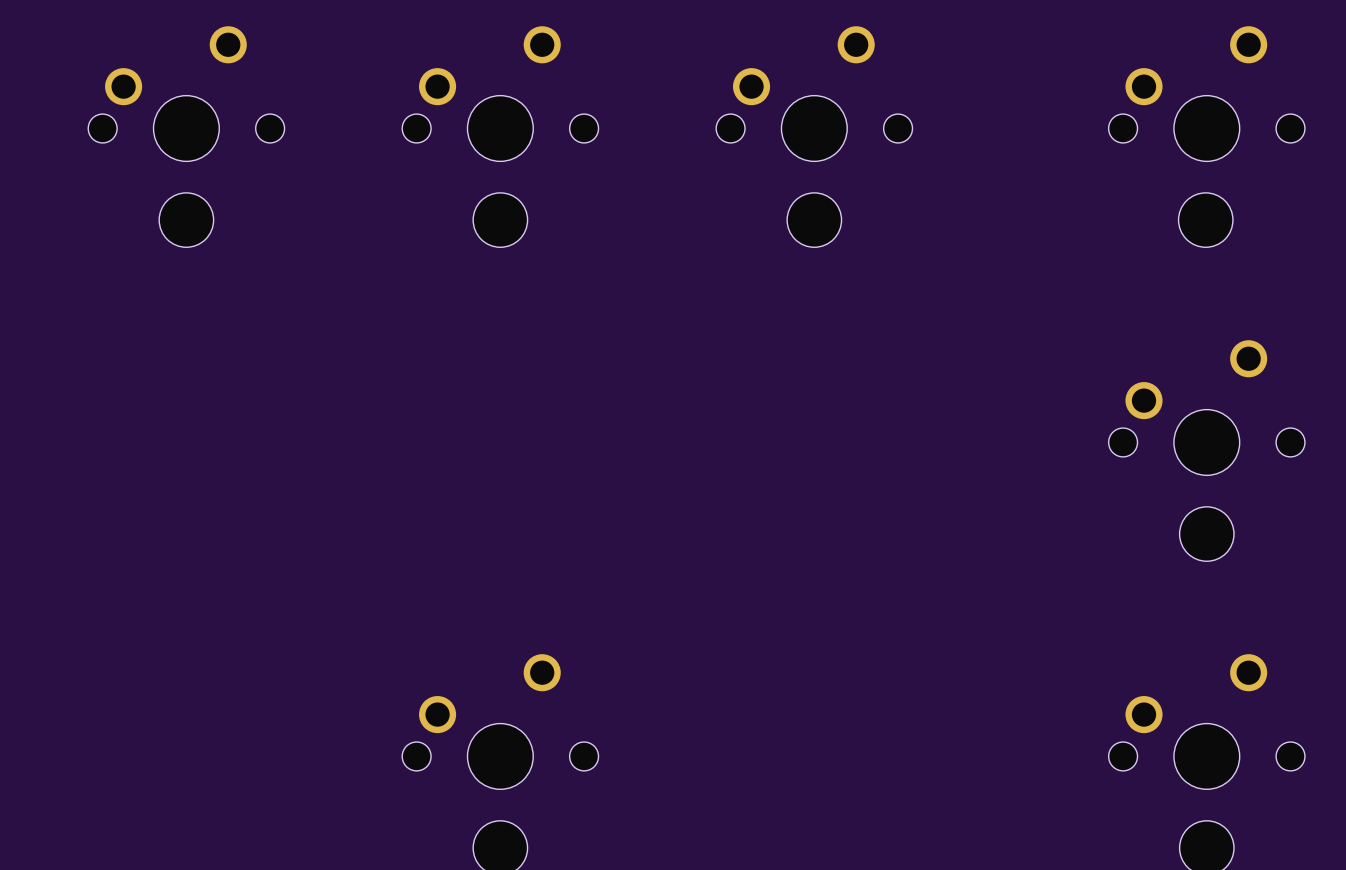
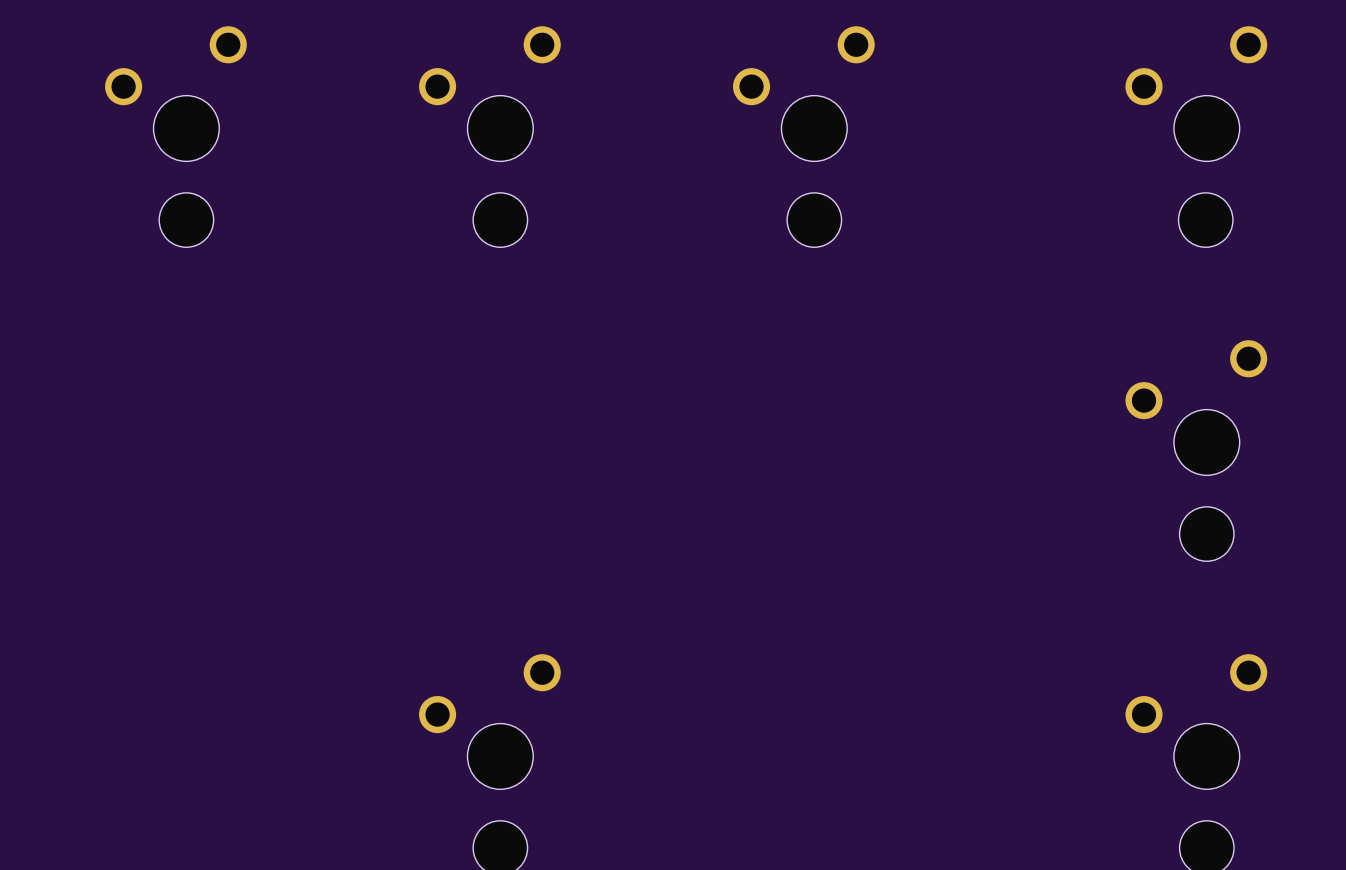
part footprint: [88, 26, 285, 162] -> [105, 26, 247, 162]
part footprint: [402, 26, 599, 162] -> [419, 26, 561, 162]
part footprint: [716, 26, 913, 162] -> [733, 26, 875, 162]
part footprint: [1108, 26, 1305, 162] -> [1125, 26, 1268, 162]
part footprint: [1108, 340, 1305, 476] -> [1125, 340, 1268, 476]
part footprint: [402, 654, 599, 790] -> [419, 654, 561, 790]
part footprint: [1108, 654, 1305, 790] -> [1125, 654, 1268, 790]

